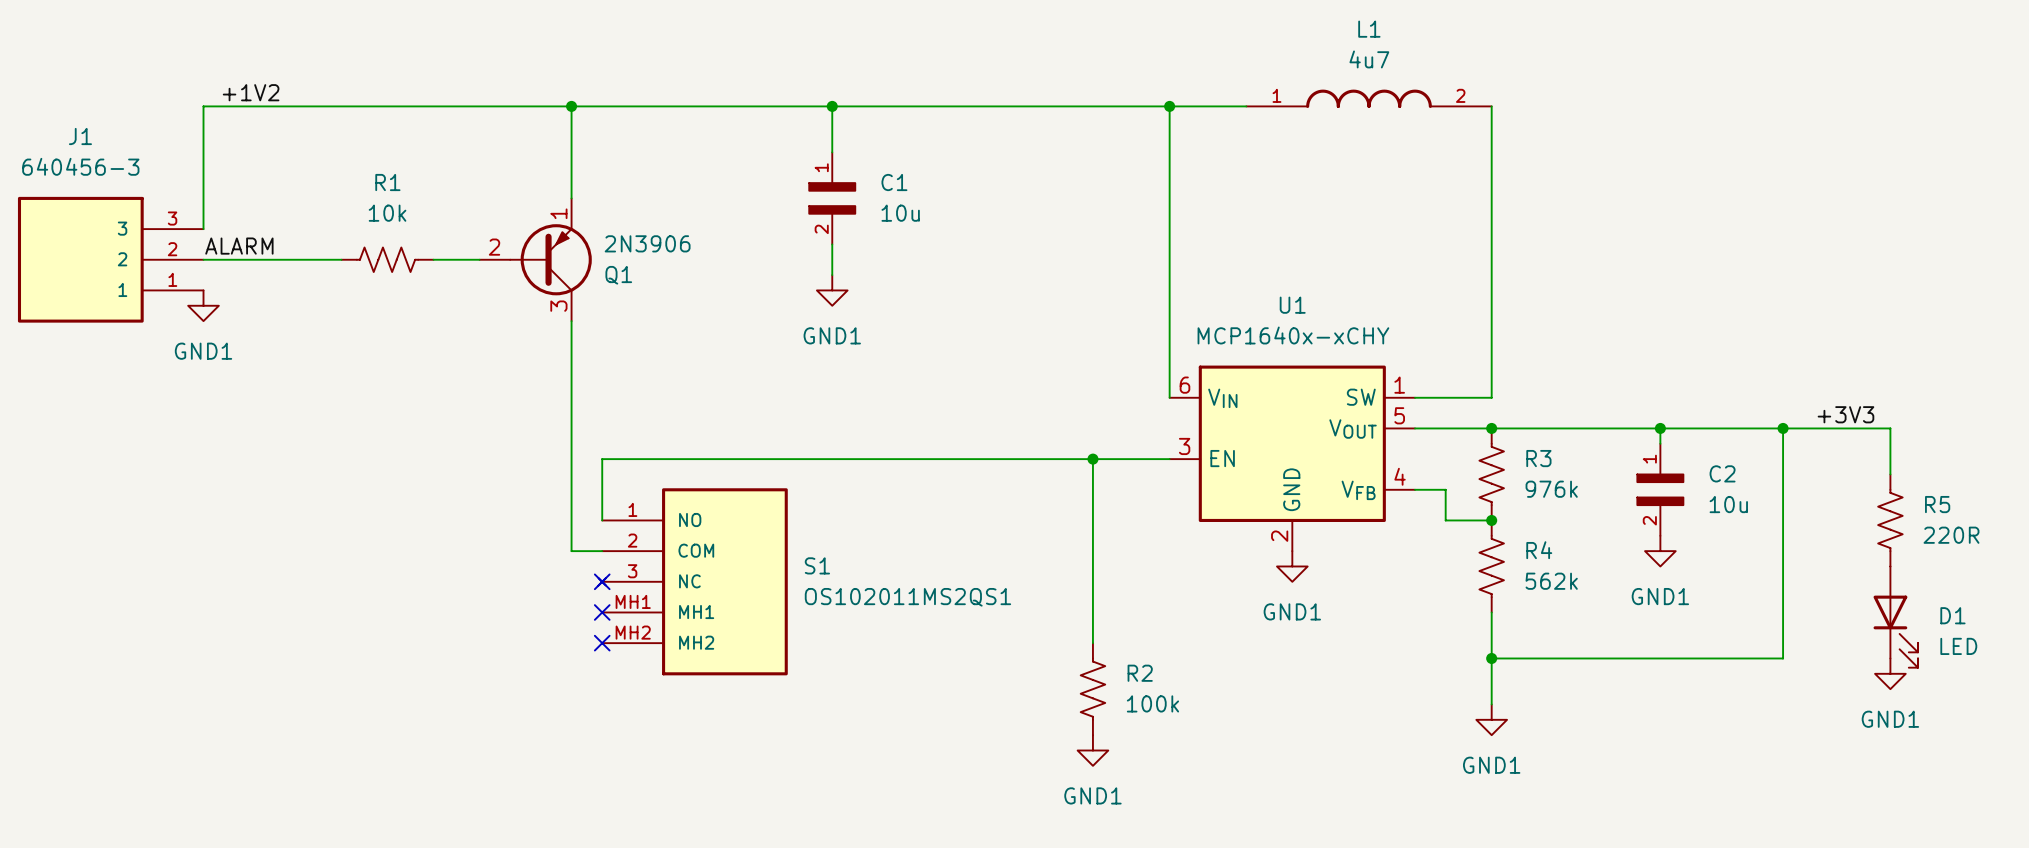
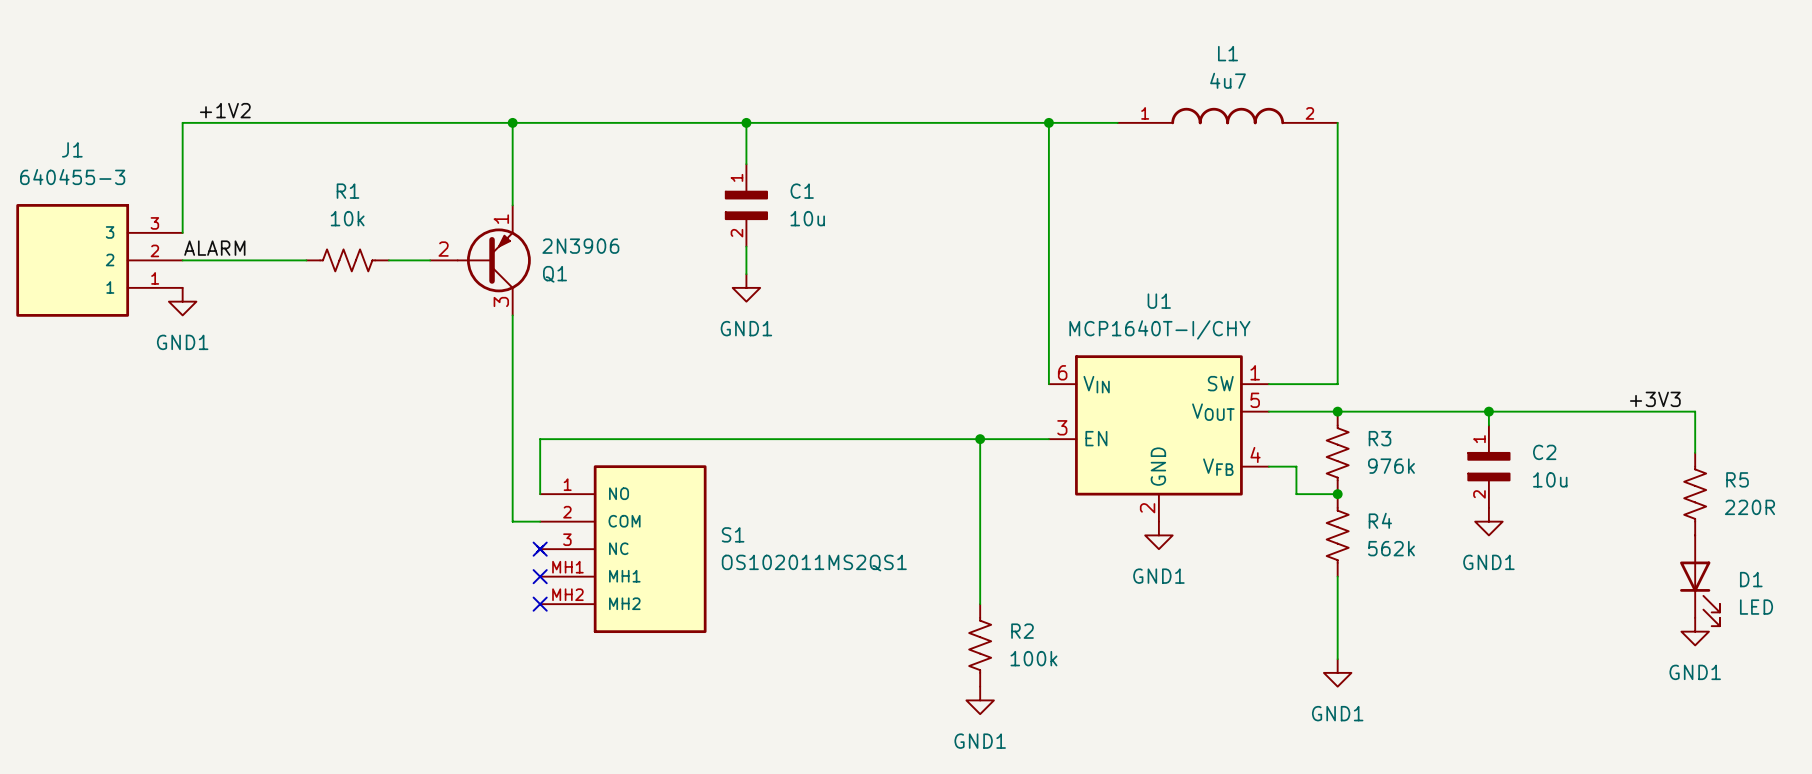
J1 value: 640456-3 (80, 166) -> 640455-3 (72, 177)
U1 value: MCP1640x-xCHY (1293, 335) -> MCP1640T-I/CHY (1159, 329)
wire: (1783, 428) (1783, 658) (1491, 658) -> none
junction: (1783, 428) -> none
junction: (1491, 658) -> none

